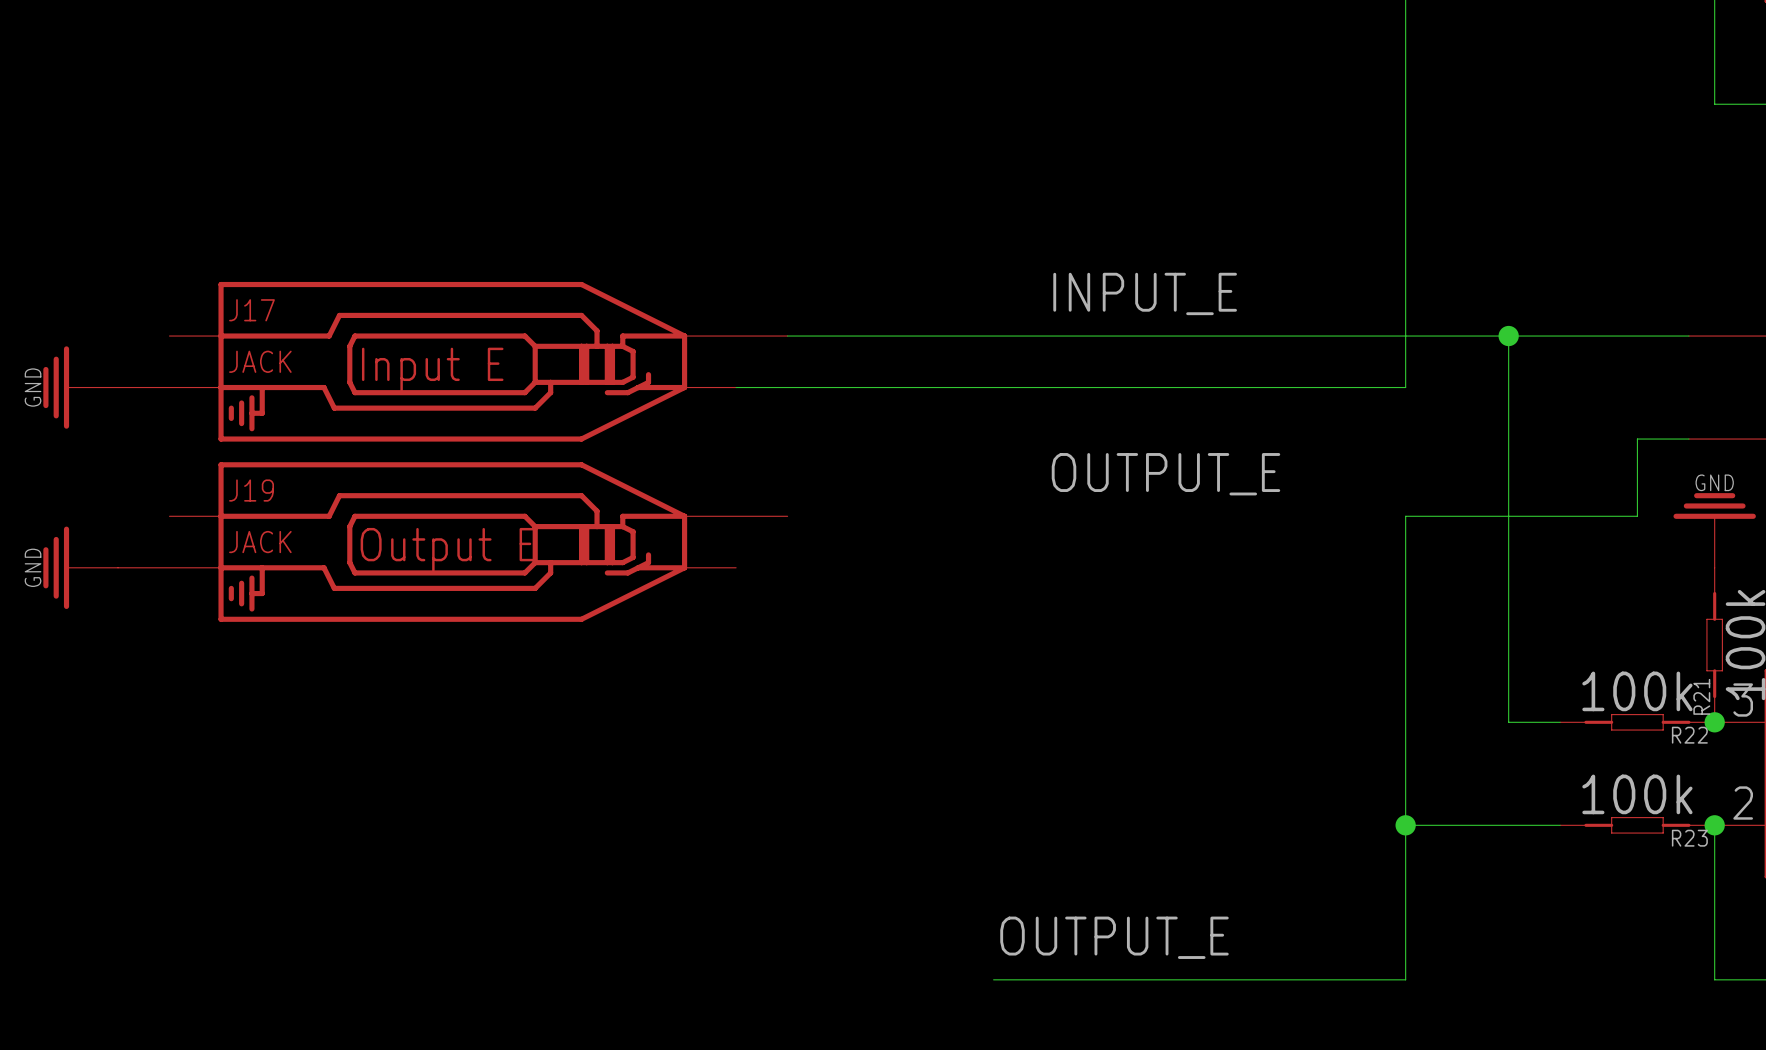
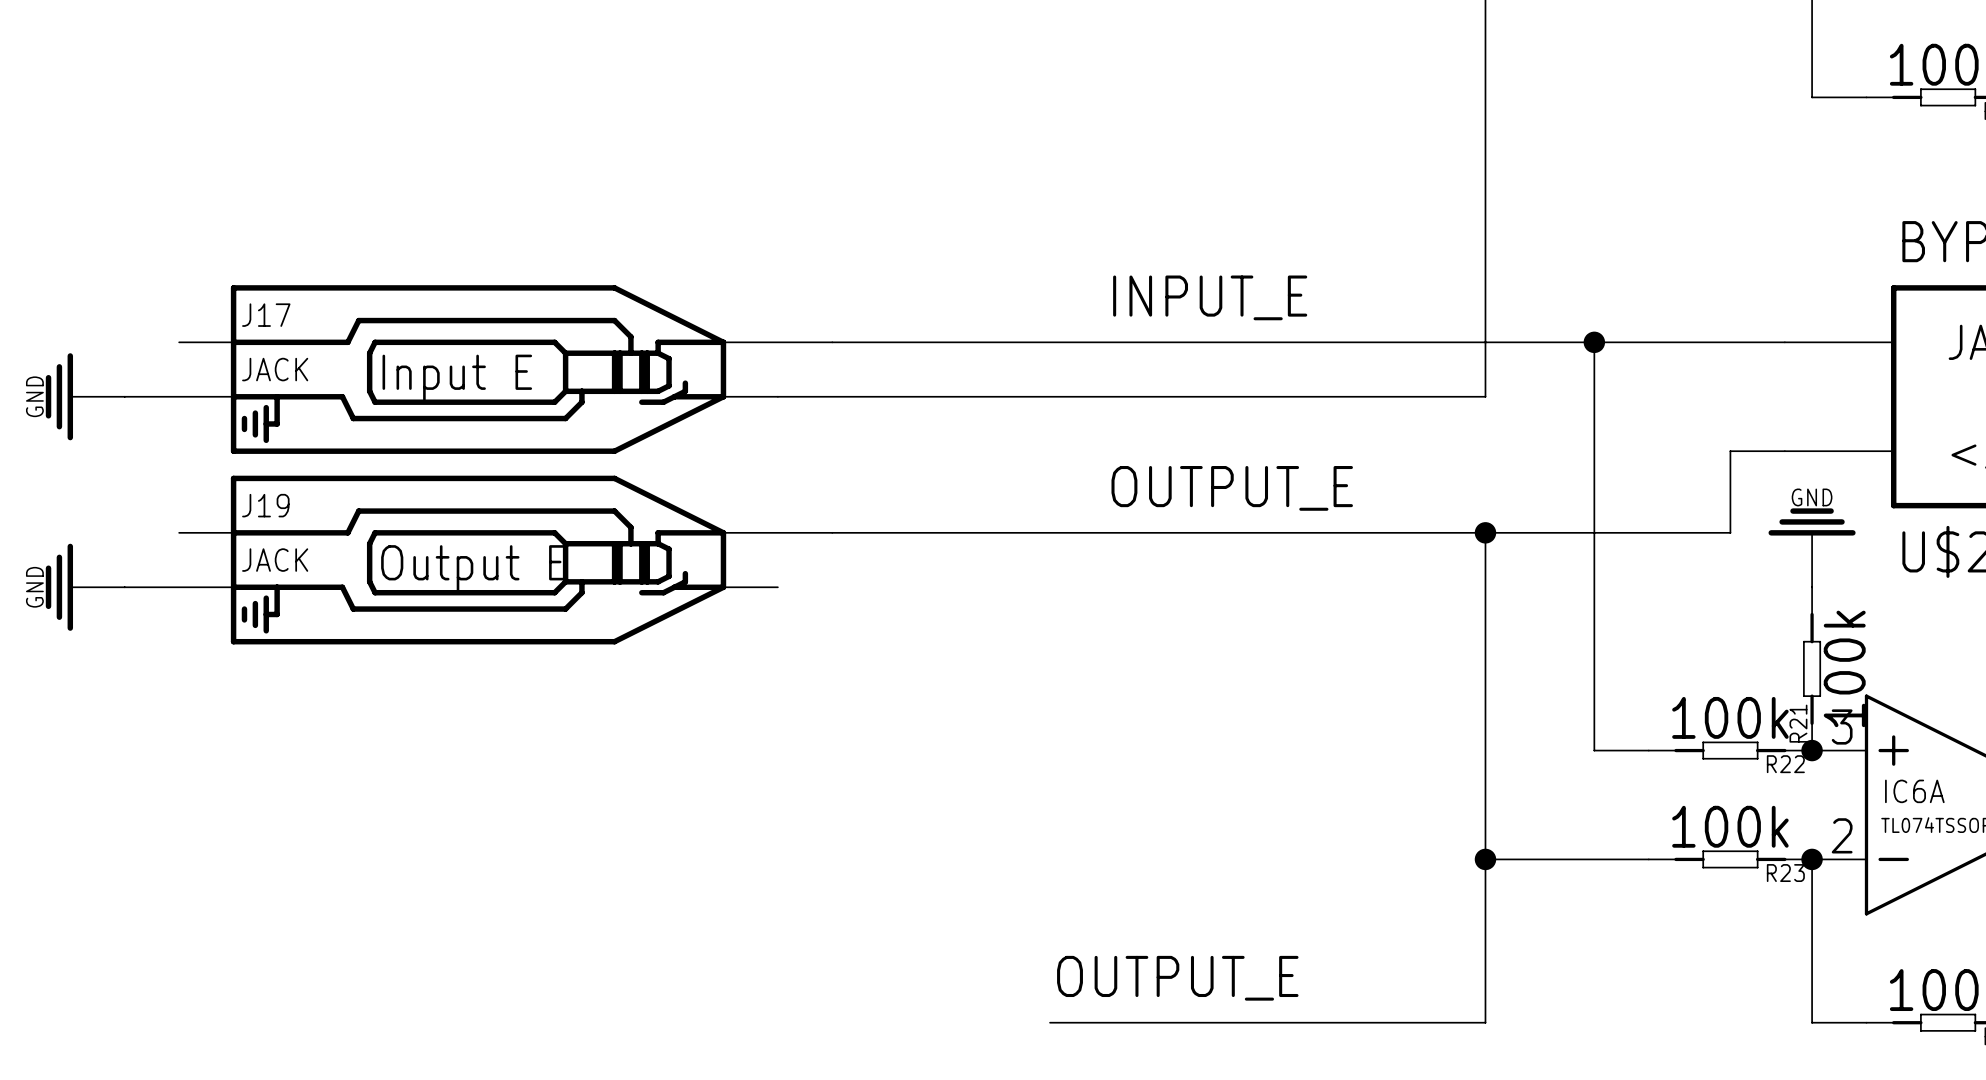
wire: none -> (832, 532) (1485, 532)
junction: none -> (1485, 532)

